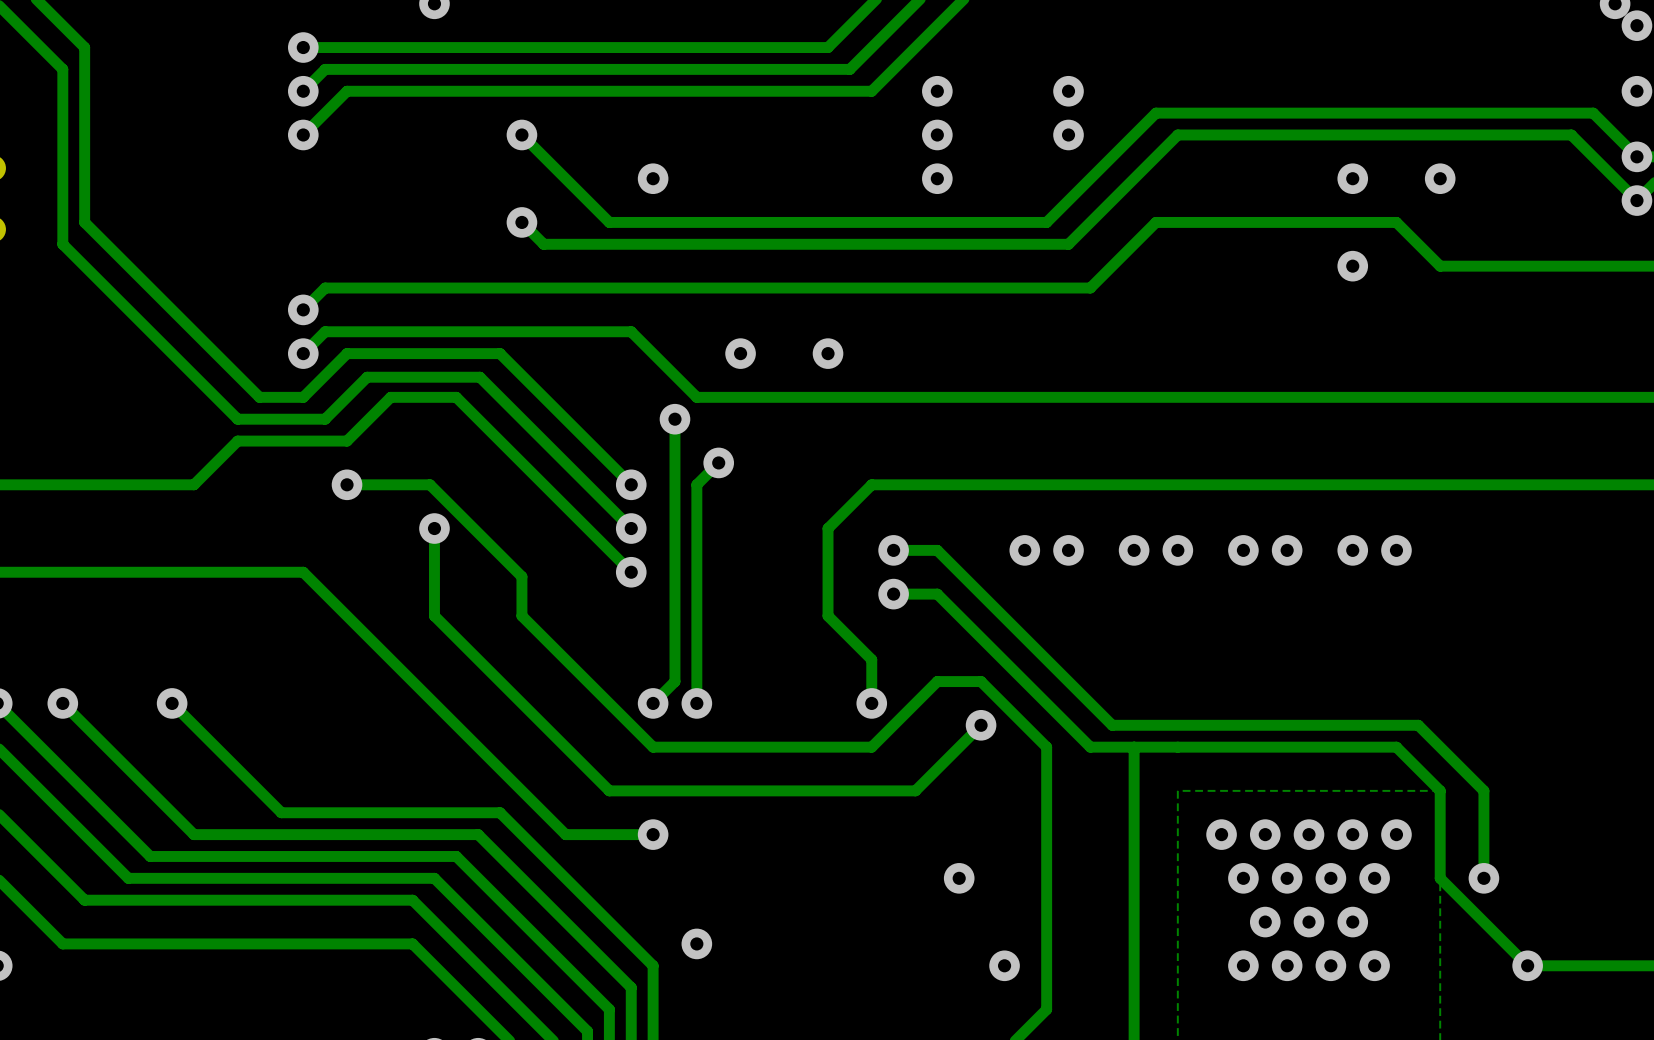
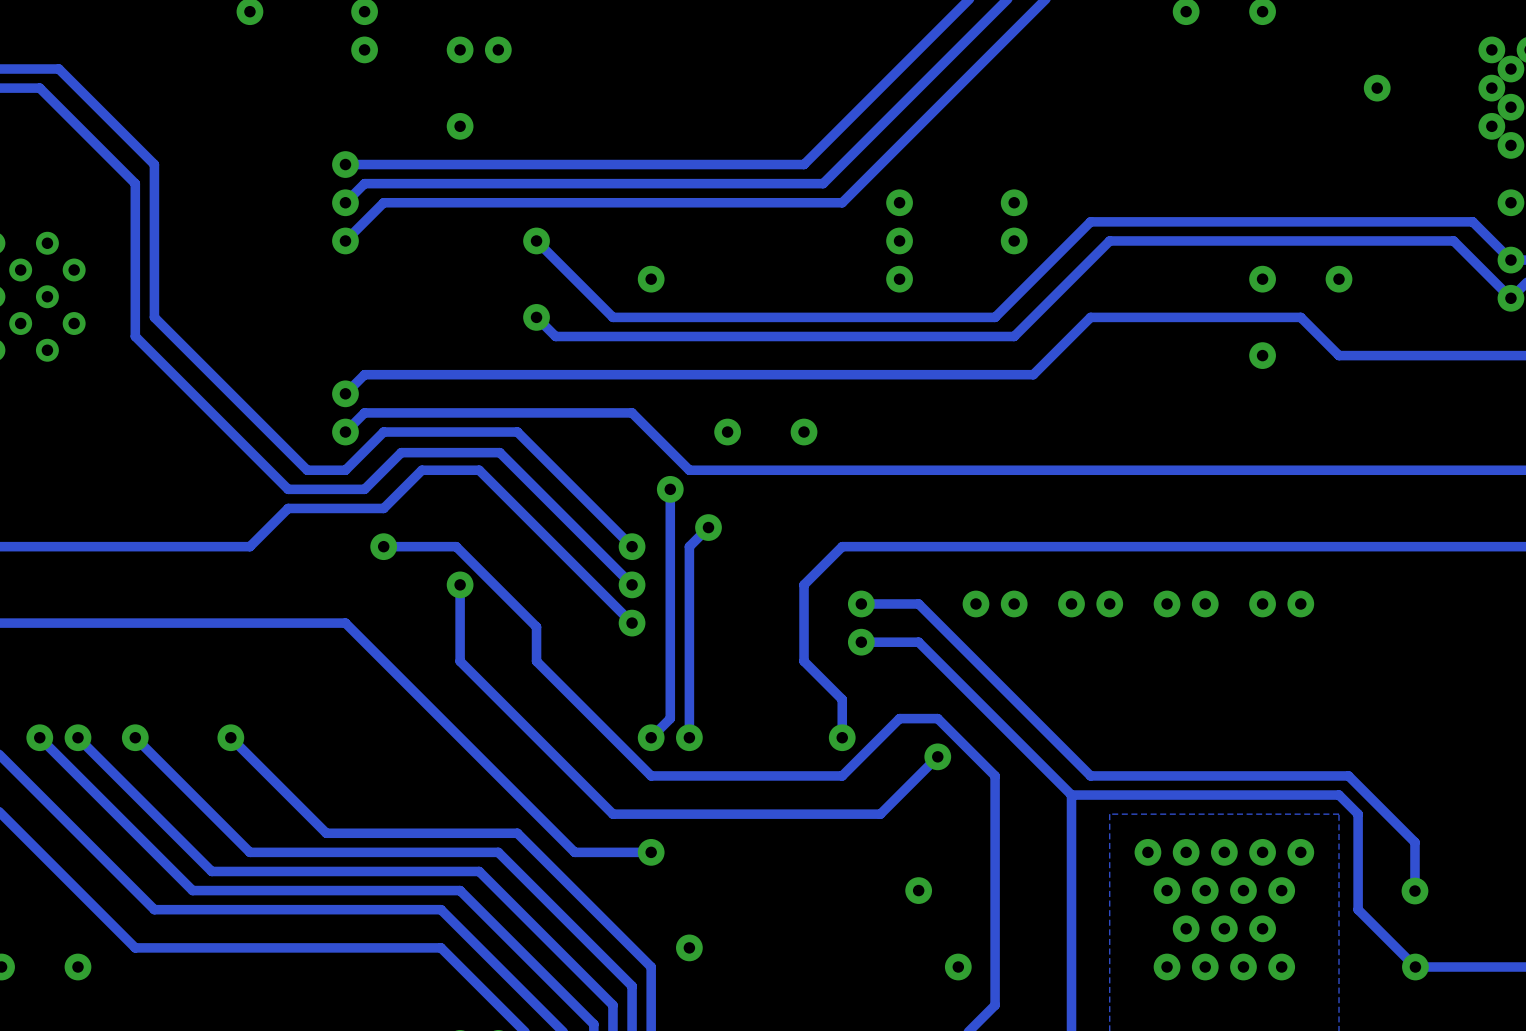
track: (937, 550) (1112, 725) (1418, 725) (1483, 790) (1483, 878) -> none
track: (937, 594) (1090, 747) (1155, 747) -> (899, 603) (918, 603) (1090, 775)
track: none -> (899, 642) (918, 642) (1071, 795) (1339, 795) (1358, 814) (1358, 909)
track: (1134, 747) (1134, 769) -> none
track: (1396, 747) (1440, 790) (1440, 878) (1462, 900) -> (1300, 775) (1348, 775) (1414, 842) (1414, 891)
via position: (1483, 878) -> (1414, 891)

